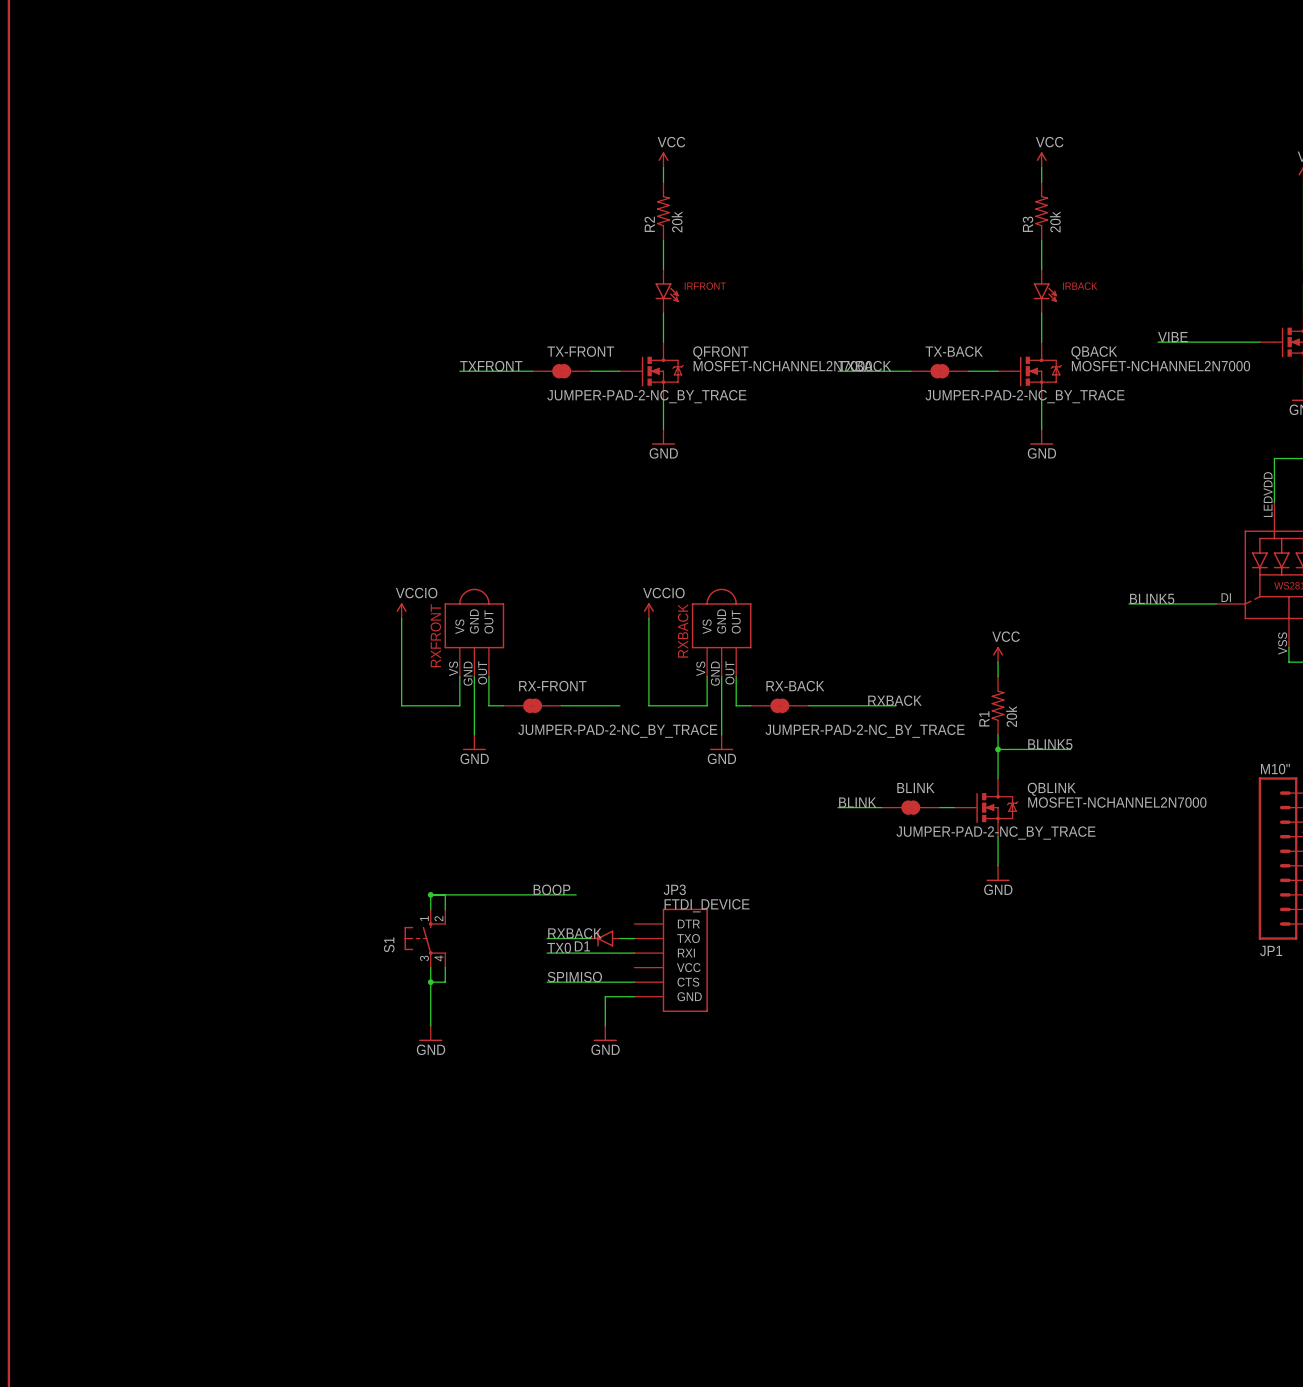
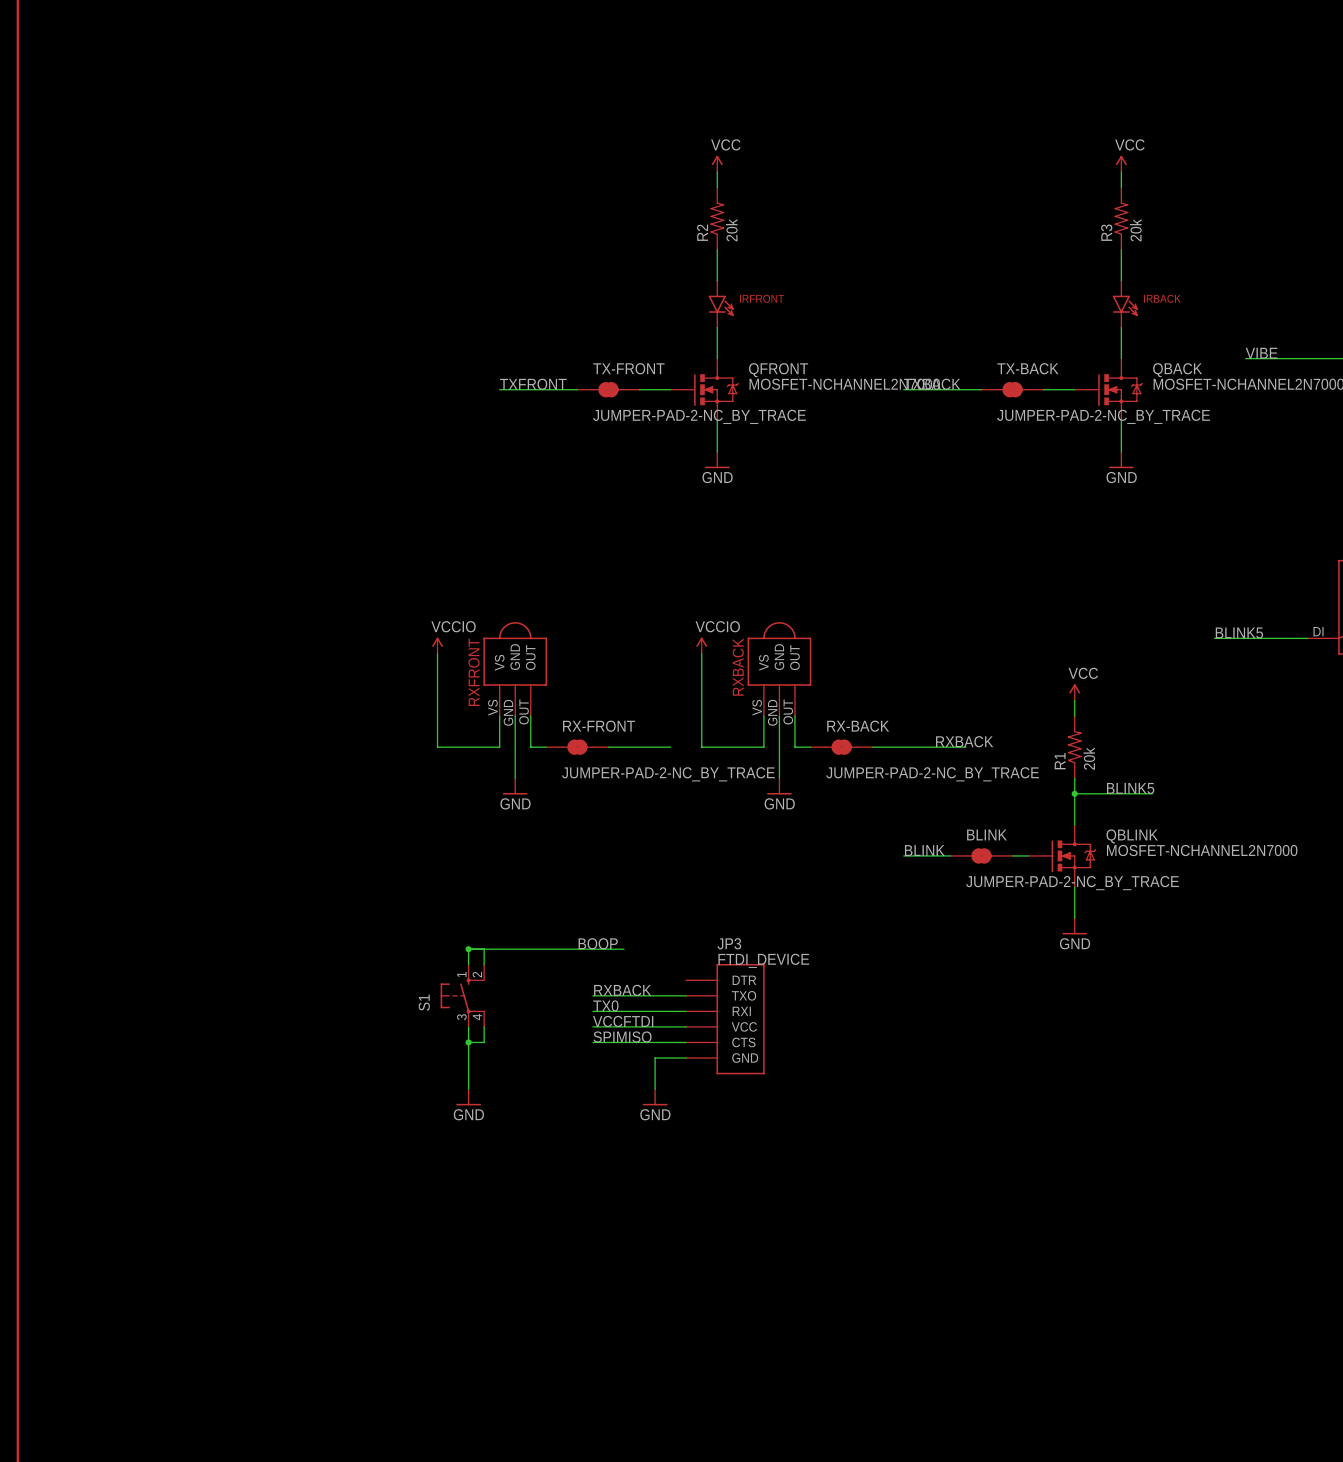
D1: (605, 938) -> none
label: none -> VCCFTDI (623, 1021)
wire: none -> (592, 1026) (686, 1026)

